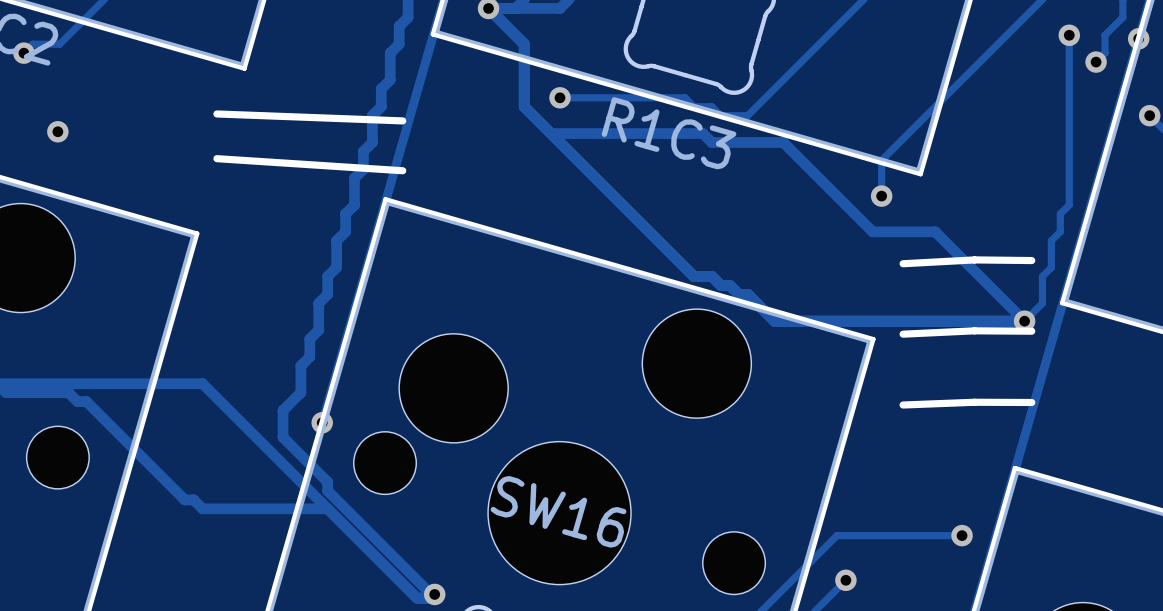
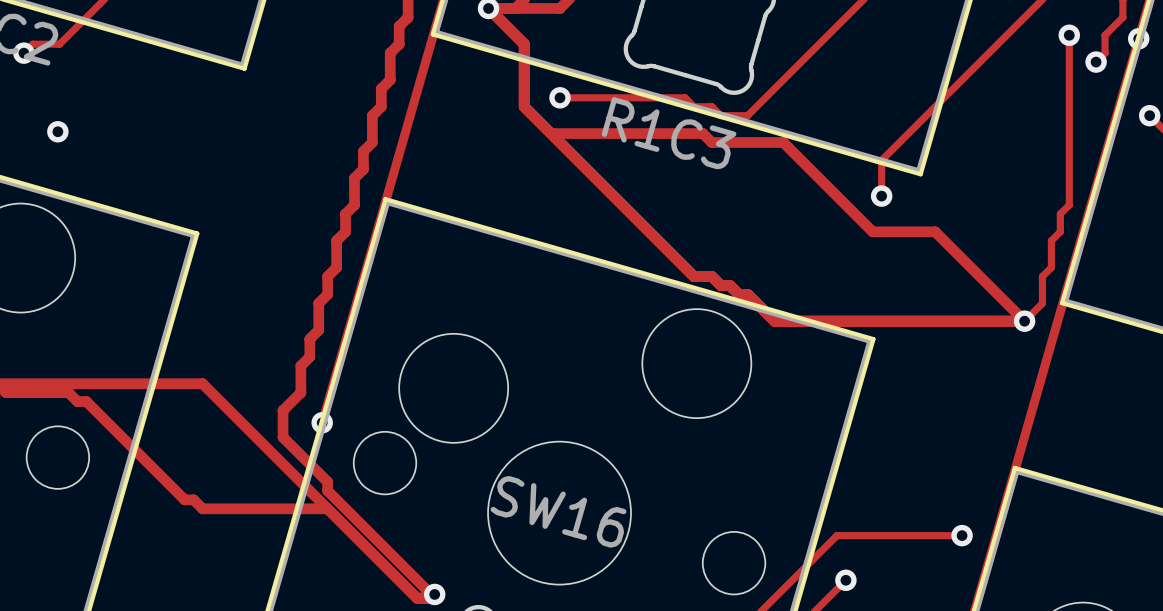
line: (216, 113) (402, 120) -> none
line: (216, 158) (402, 170) -> none
line: (1031, 260) (974, 259) (903, 263) -> none
line: (1031, 331) (974, 330) (903, 334) -> none
line: (1031, 402) (903, 405) -> none

